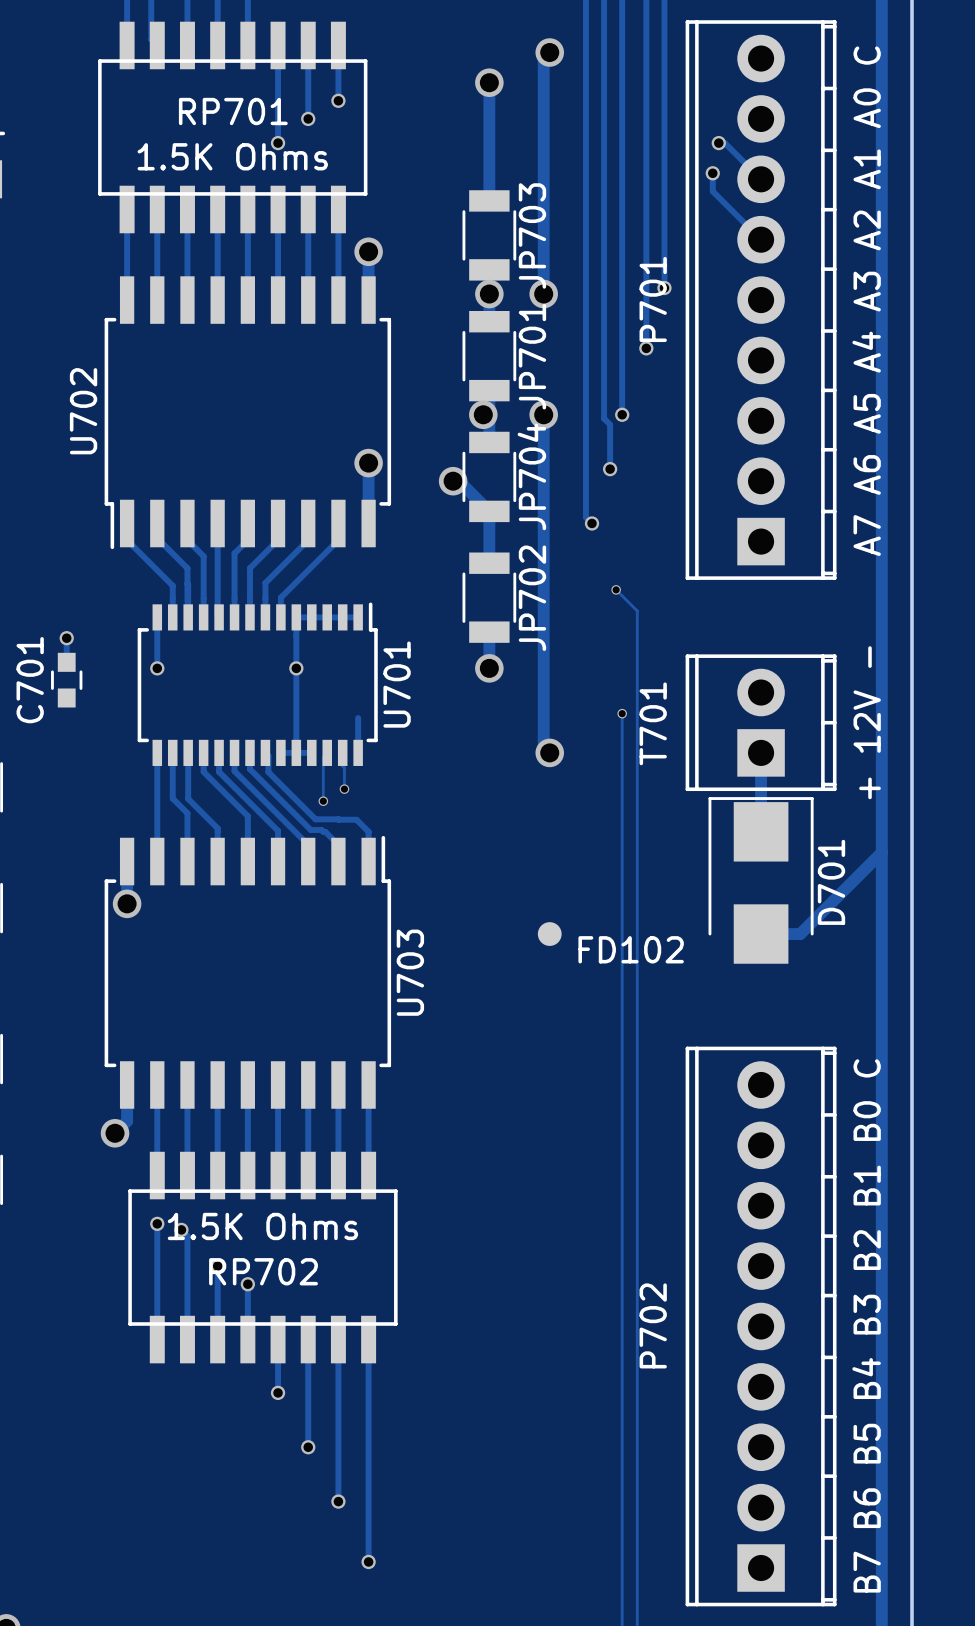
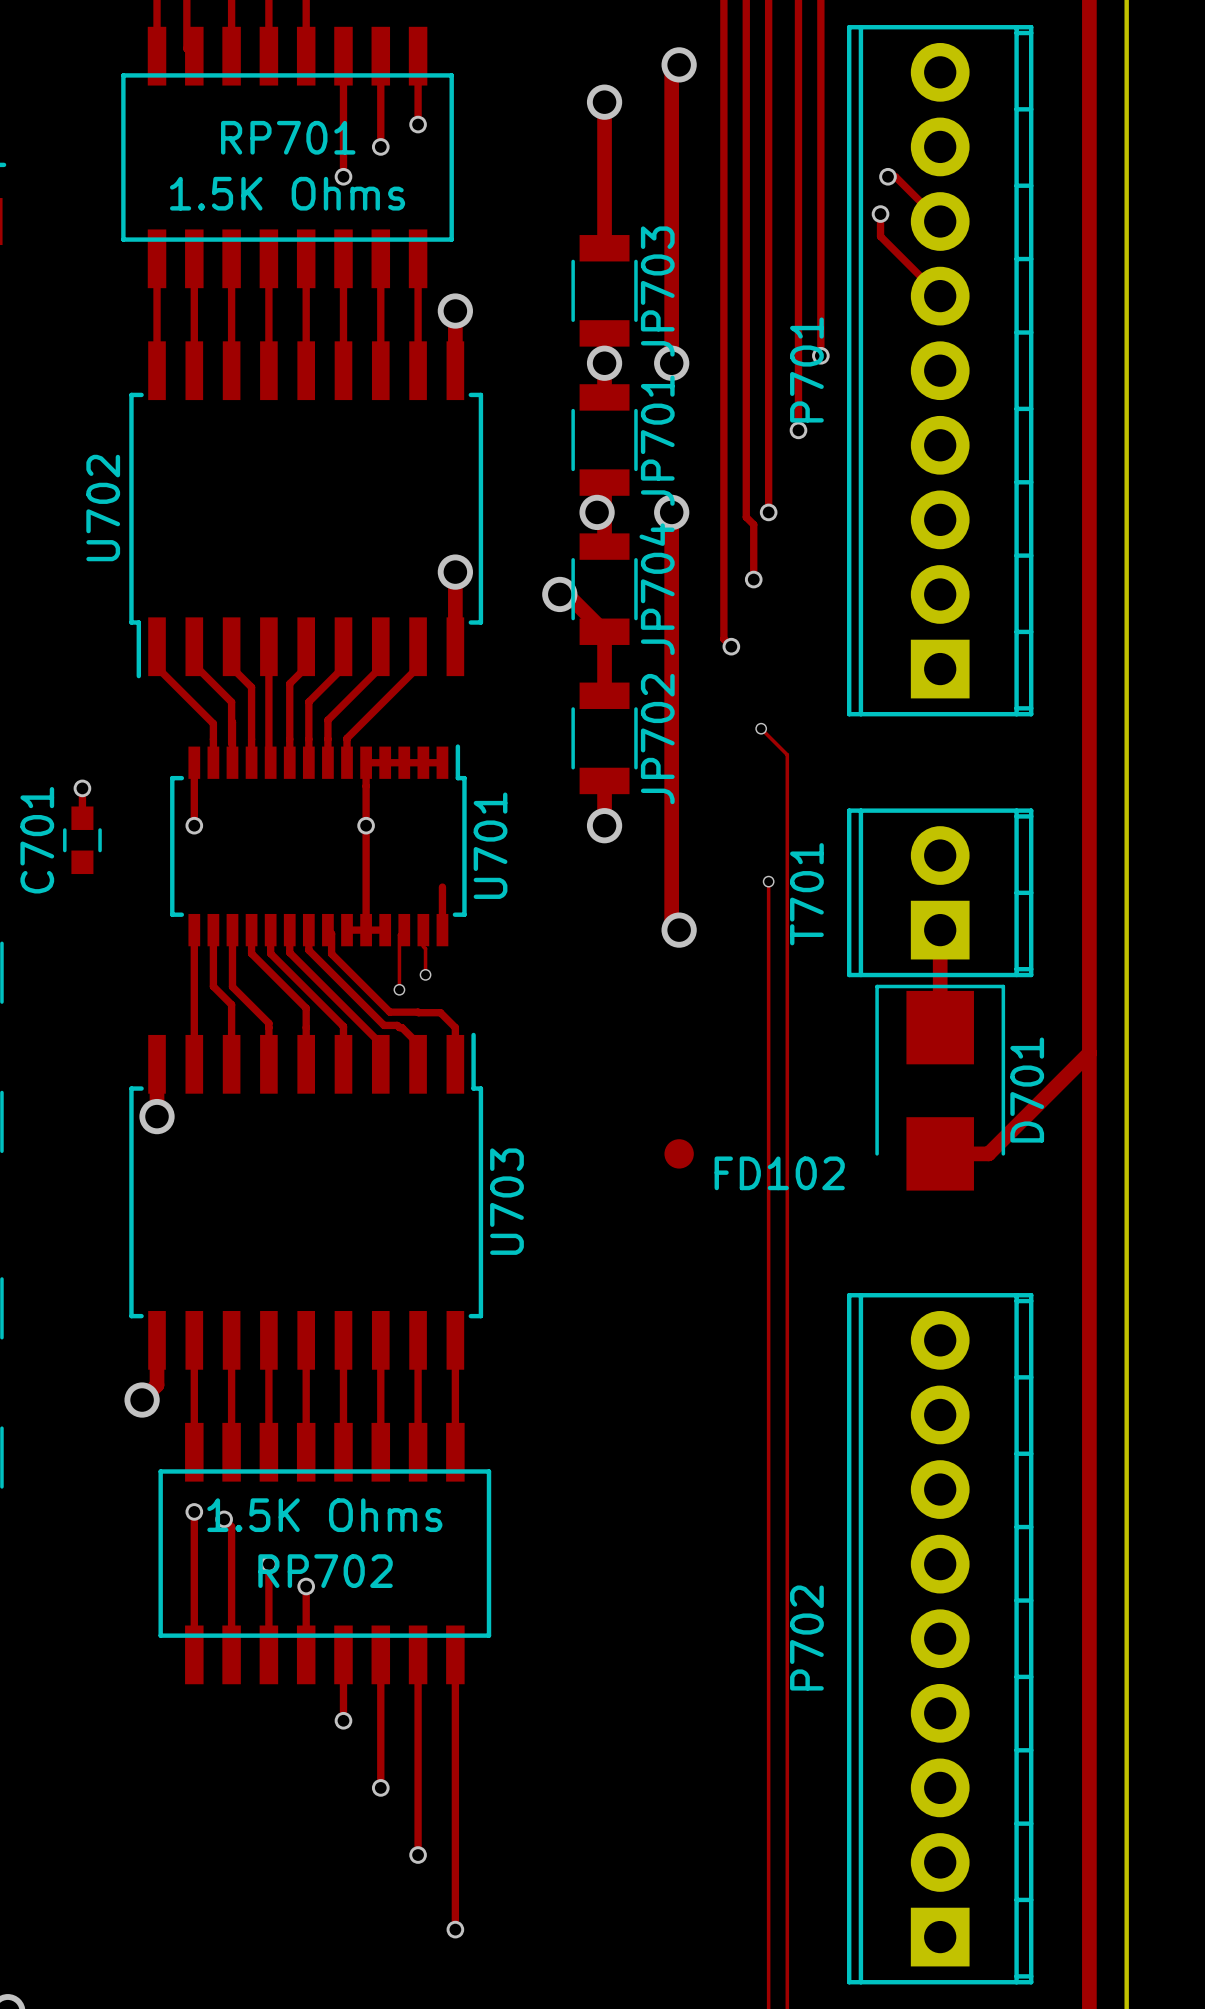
P701 value: A7 A6 A5 A4 A3 A2 A1 A0 C (866, 301) -> none
T701 value: + 12V - (867, 722) -> none
P702 value: B7 B6 B5 B4 B3 B2 B1 B0 C (866, 1325) -> none

